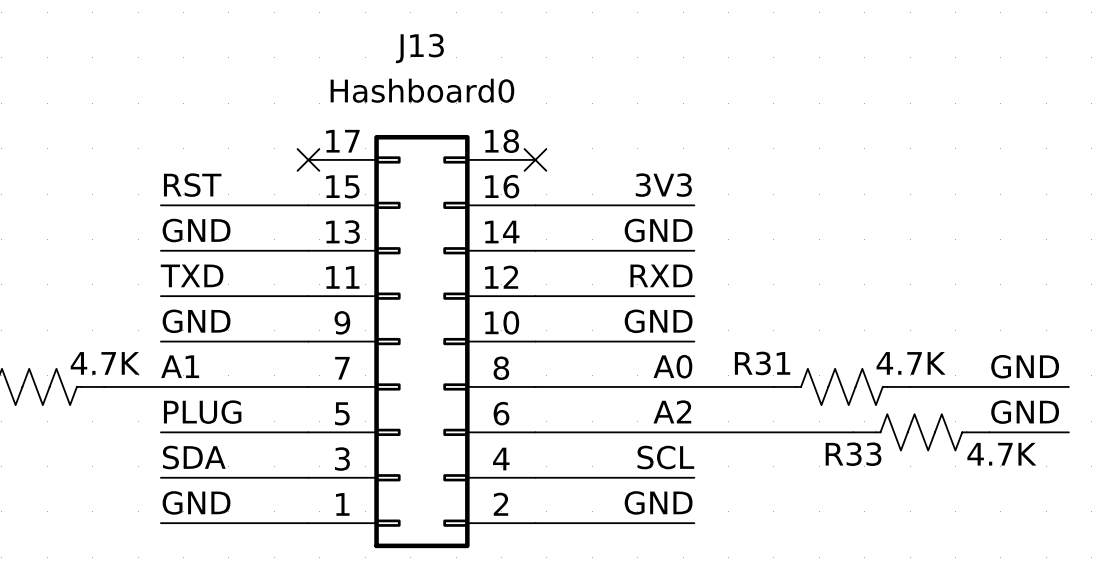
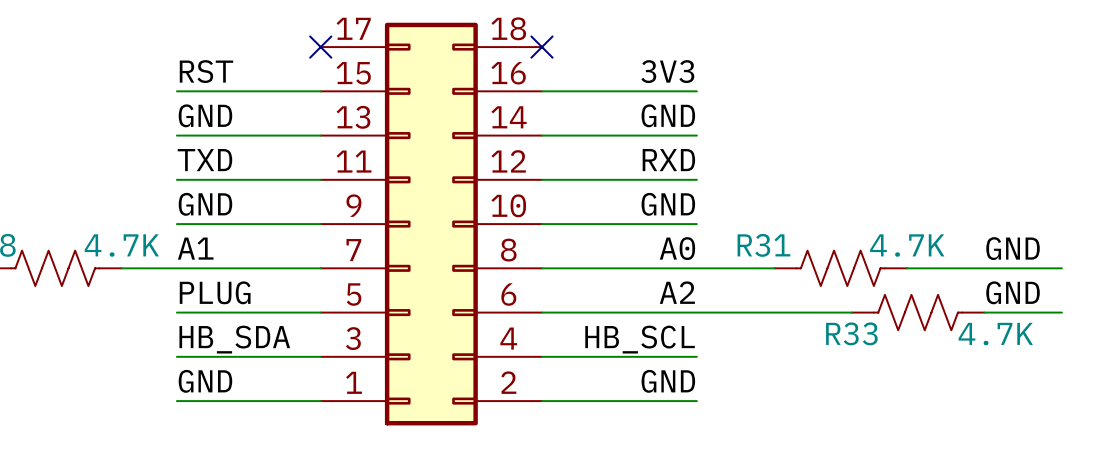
label: SDA (194, 457) -> HB_SDA (234, 339)
label: SCL (665, 457) -> HB_SCL (640, 339)

